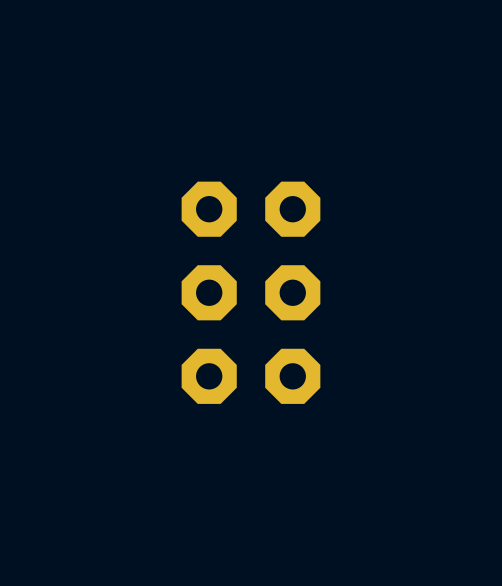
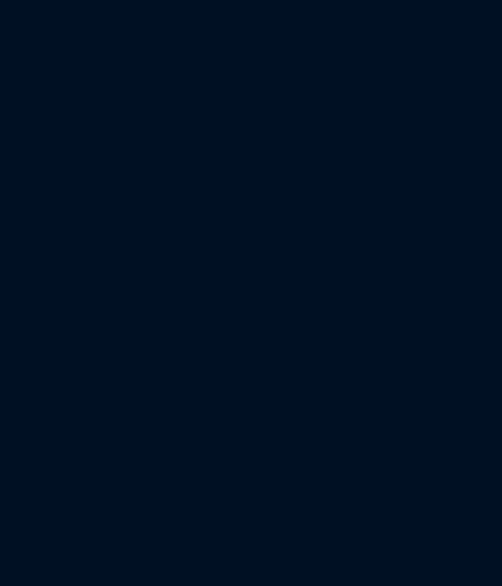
part: (250, 292) -> none

